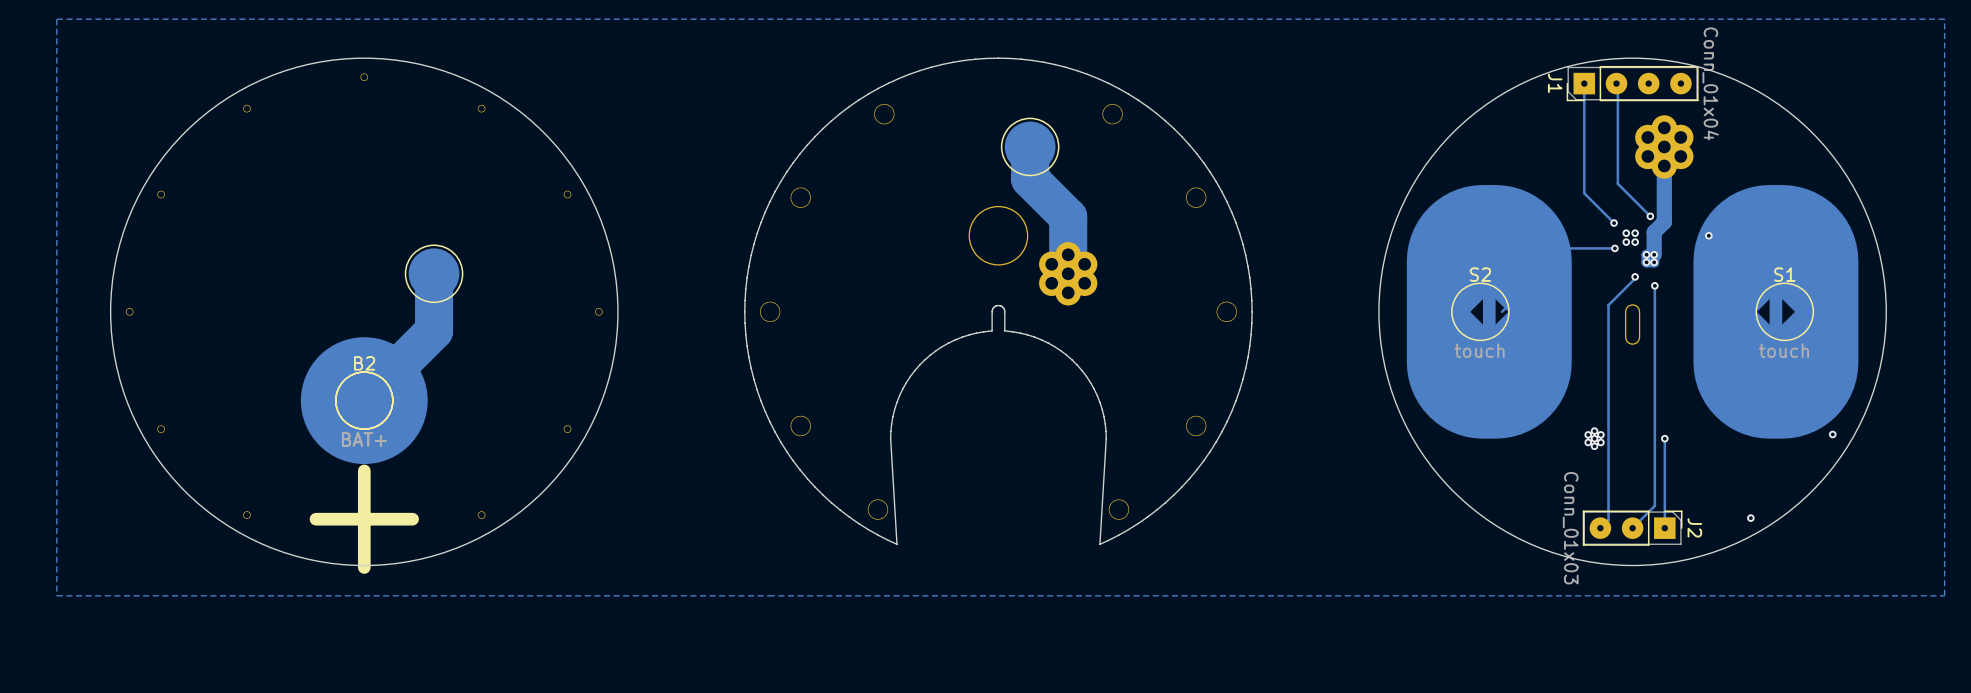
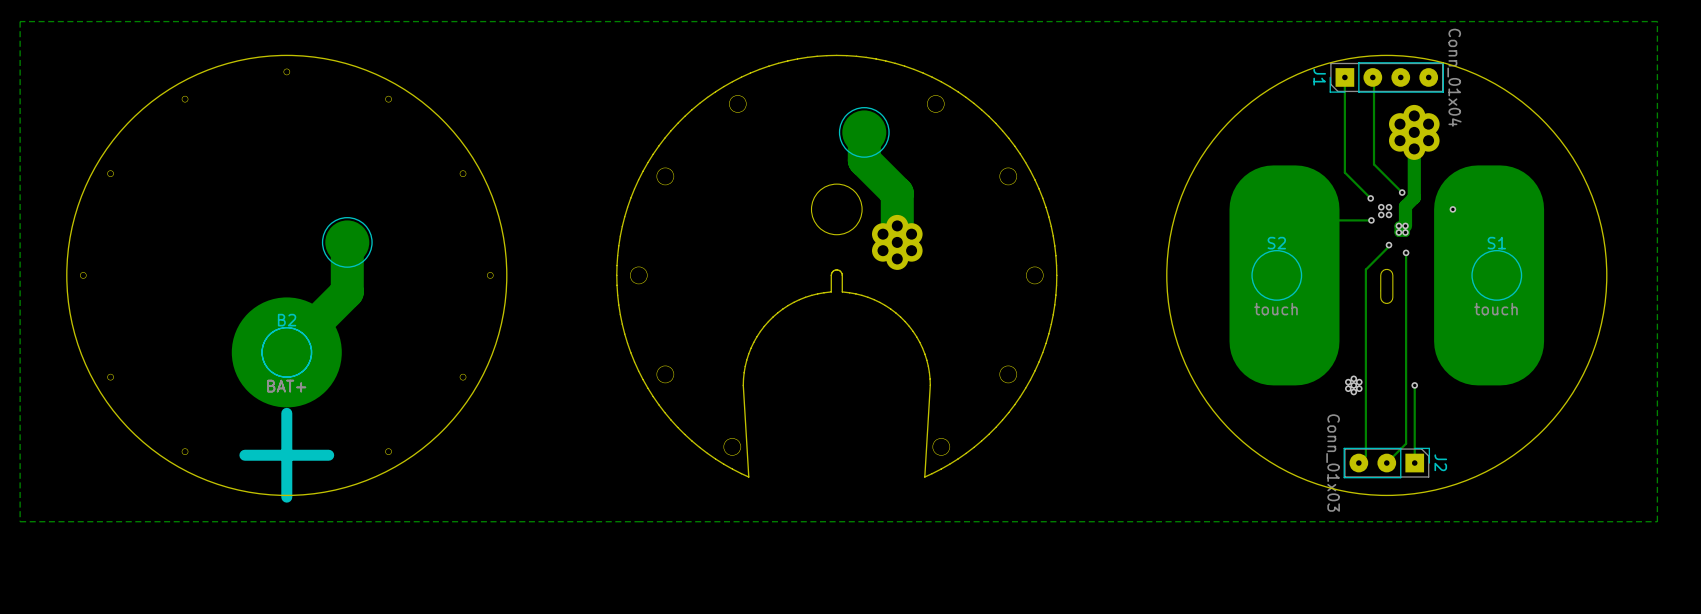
S2 footprint: [1406, 185, 1572, 439] -> [1229, 165, 1340, 386]
S1 footprint: [1693, 185, 1859, 439] -> [1434, 165, 1545, 386]
via: (1832, 434) -> none
via: (1750, 518) -> none

